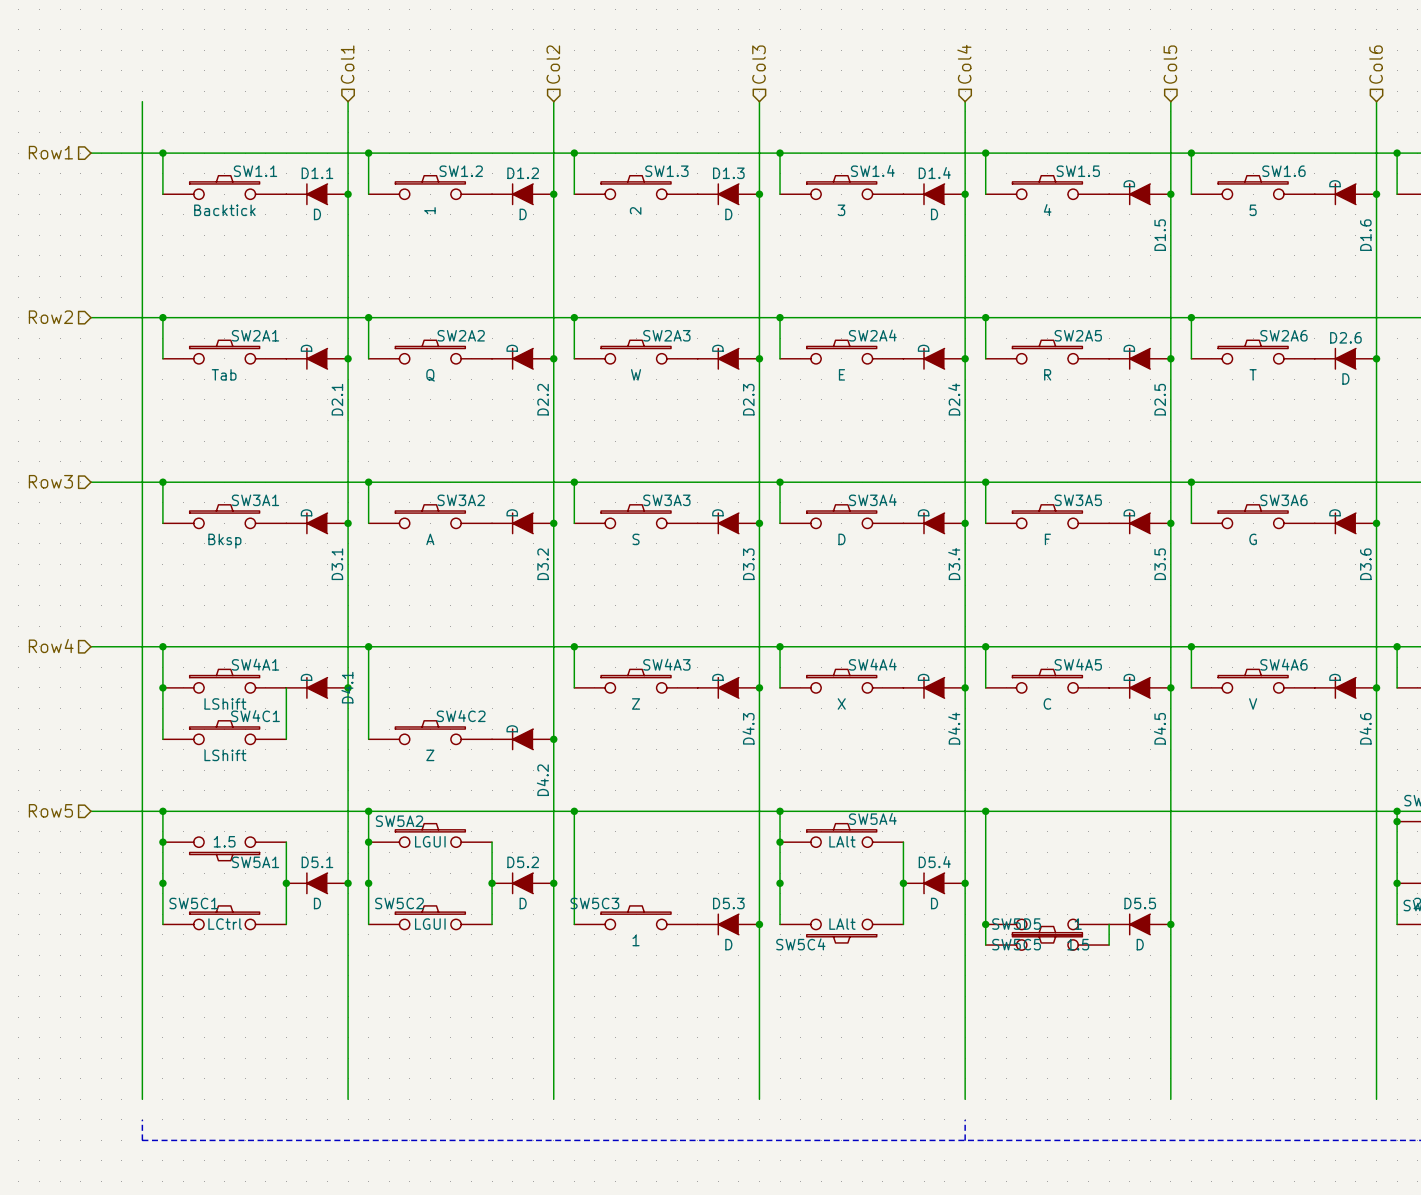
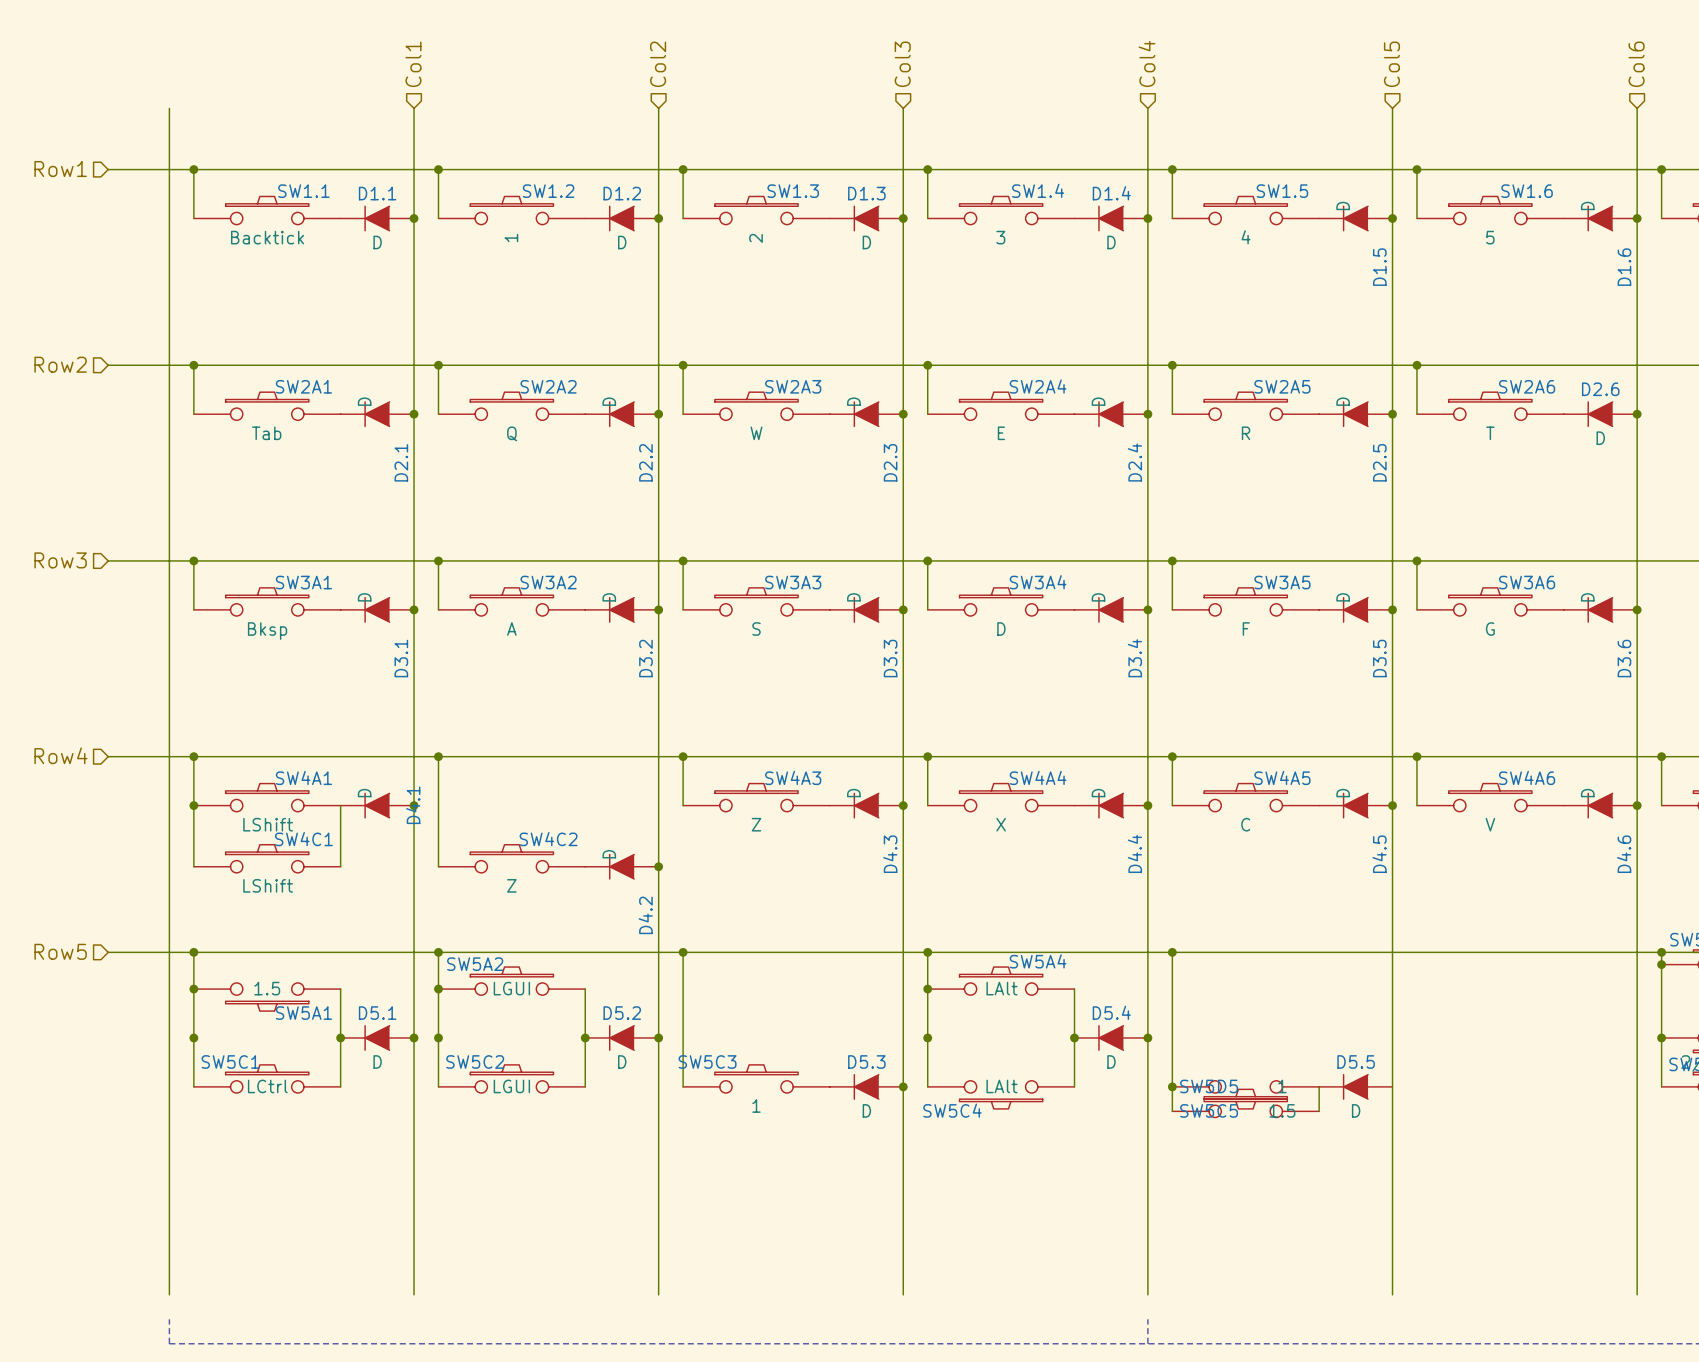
junction: (1170, 924) -> none

